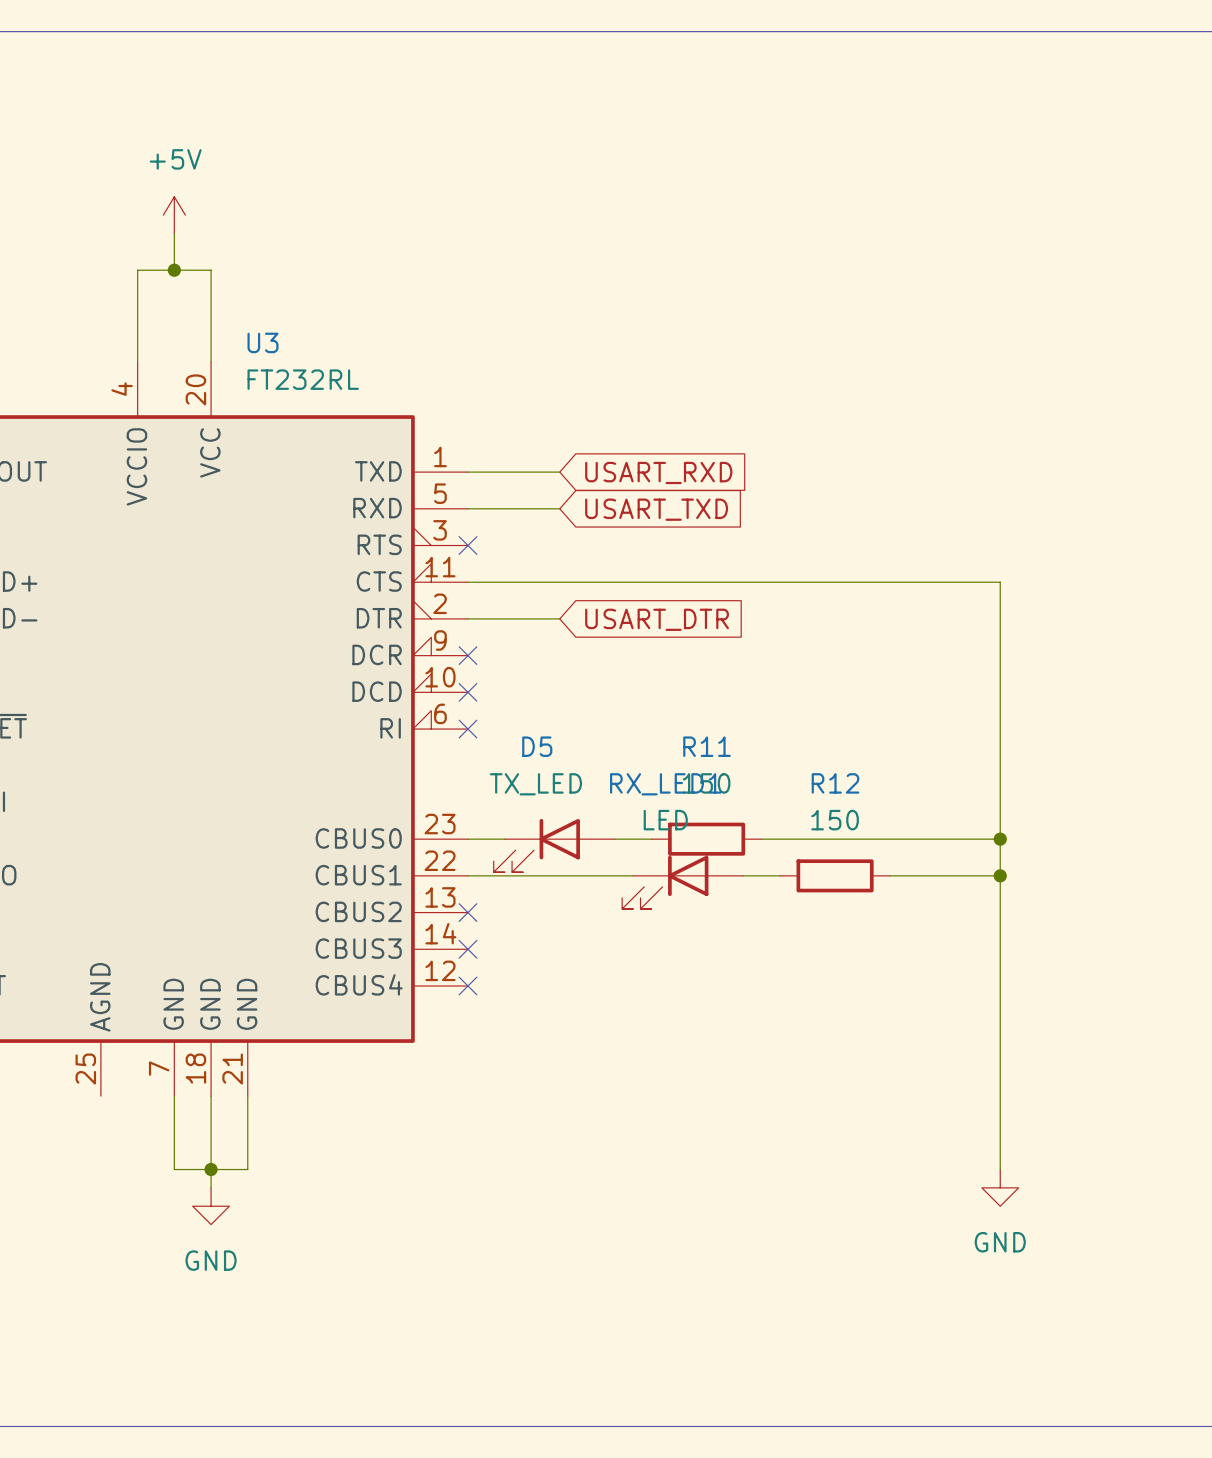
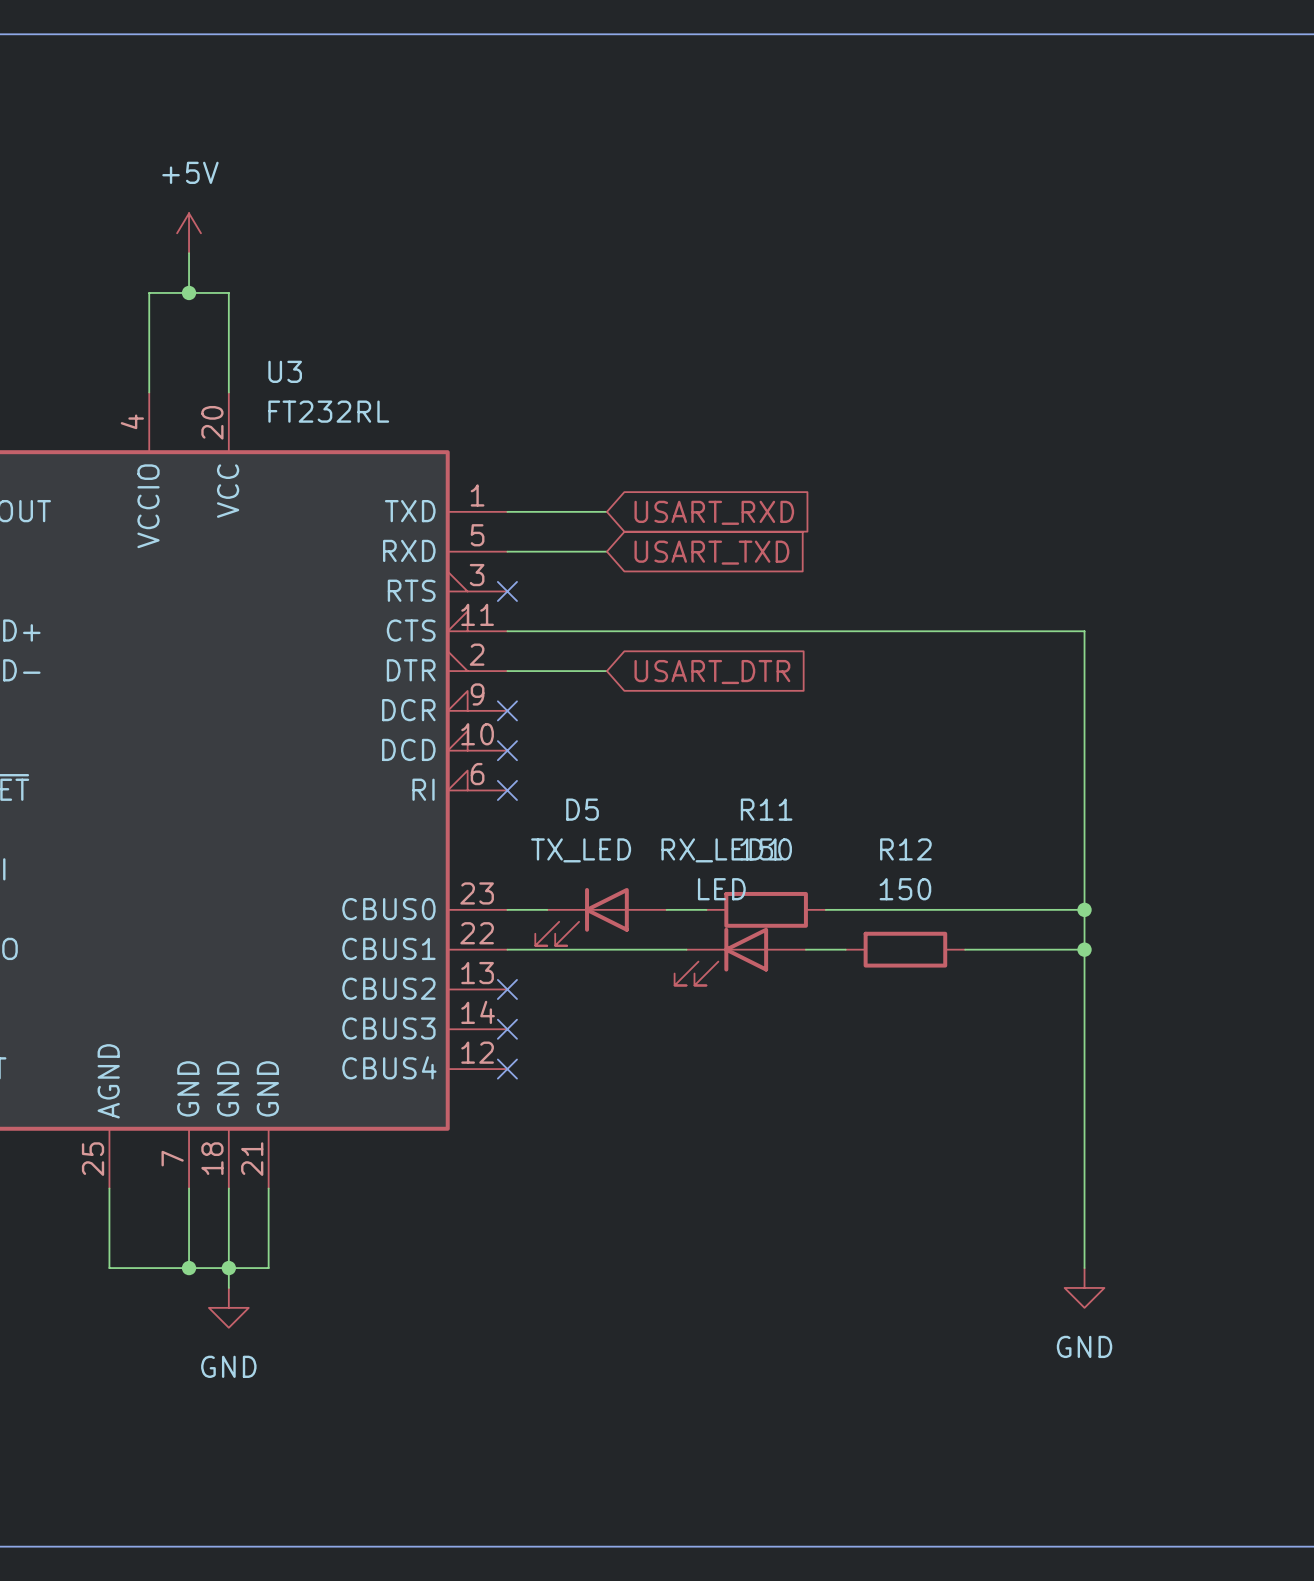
wire: none -> (109, 1188) (109, 1268) (189, 1268)
junction: none -> (189, 1268)

